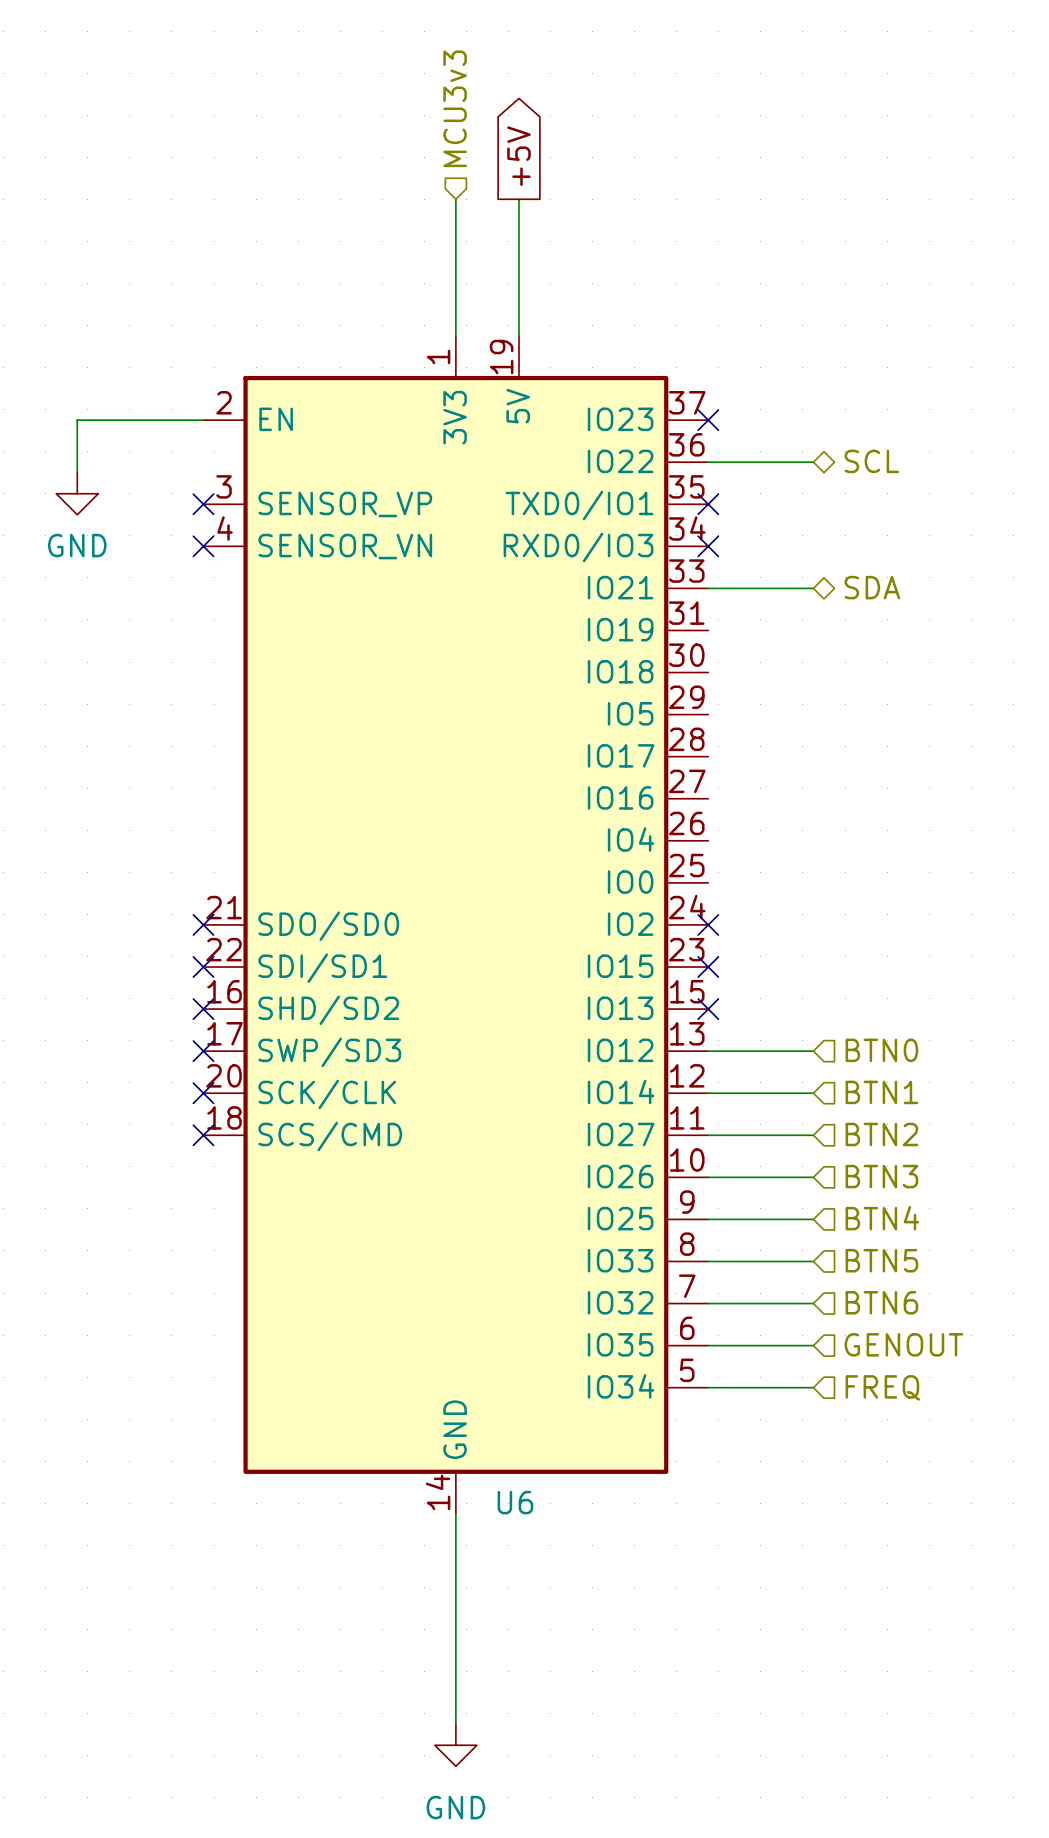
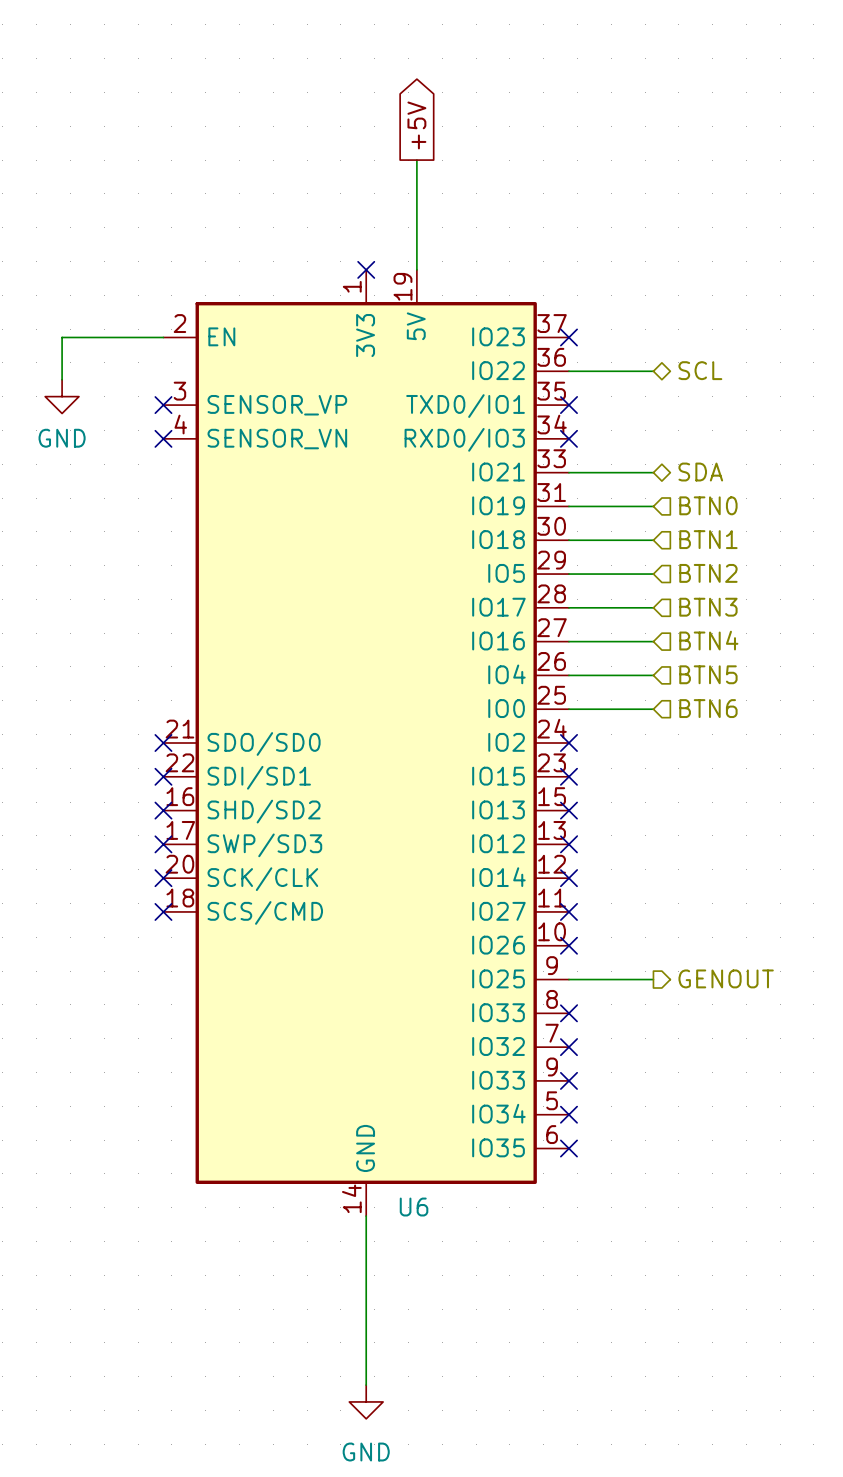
hierarchical label: MCU3v3 (455, 108) -> none
wire: (455, 199) (455, 335) -> none
U6 symbol: [203, 335, 709, 1514] -> [163, 269, 569, 1217]
no-connect mark: none -> (366, 269)
hierarchical label: none -> BTN0 (708, 505)
wire: none -> (568, 506) (653, 506)
hierarchical label: none -> BTN1 (708, 539)
hierarchical label: none -> BTN2 (708, 573)
hierarchical label: none -> BTN3 (708, 607)
hierarchical label: none -> BTN4 (708, 640)
wire: none -> (568, 675) (653, 675)
hierarchical label: none -> BTN5 (708, 674)
hierarchical label: none -> BTN6 (708, 708)
hierarchical label: BTN0 (881, 1050) -> none
wire: (708, 1051) (813, 1051) -> (568, 540) (653, 540)
no-connect mark: none -> (568, 844)
hierarchical label: BTN1 (881, 1092) -> none
wire: (708, 1093) (813, 1093) -> (568, 574) (653, 574)
no-connect mark: none -> (568, 878)
hierarchical label: BTN2 (881, 1134) -> none
wire: (708, 1135) (813, 1135) -> (568, 607) (653, 607)
no-connect mark: none -> (568, 911)
hierarchical label: BTN3 (881, 1176) -> none
wire: (708, 1177) (813, 1177) -> (568, 641) (653, 641)
no-connect mark: none -> (568, 945)
hierarchical label shape: input (882, 1218) -> output (726, 978)
hierarchical label: BTN4 (882, 1218) -> GENOUT (726, 978)
hierarchical label: BTN5 (881, 1260) -> none
wire: (708, 1261) (813, 1261) -> (568, 709) (653, 709)
no-connect mark: none -> (568, 1013)
hierarchical label: BTN6 (881, 1302) -> none
wire: (708, 1303) (813, 1303) -> none
no-connect mark: none -> (568, 1047)
hierarchical label: GENOUT (903, 1344) -> none
wire: (708, 1345) (813, 1345) -> none
no-connect mark: none -> (568, 1080)
wire: (708, 1387) (813, 1387) -> none
no-connect mark: none -> (568, 1114)
hierarchical label: FREQ (882, 1387) -> none
no-connect mark: none -> (568, 1148)

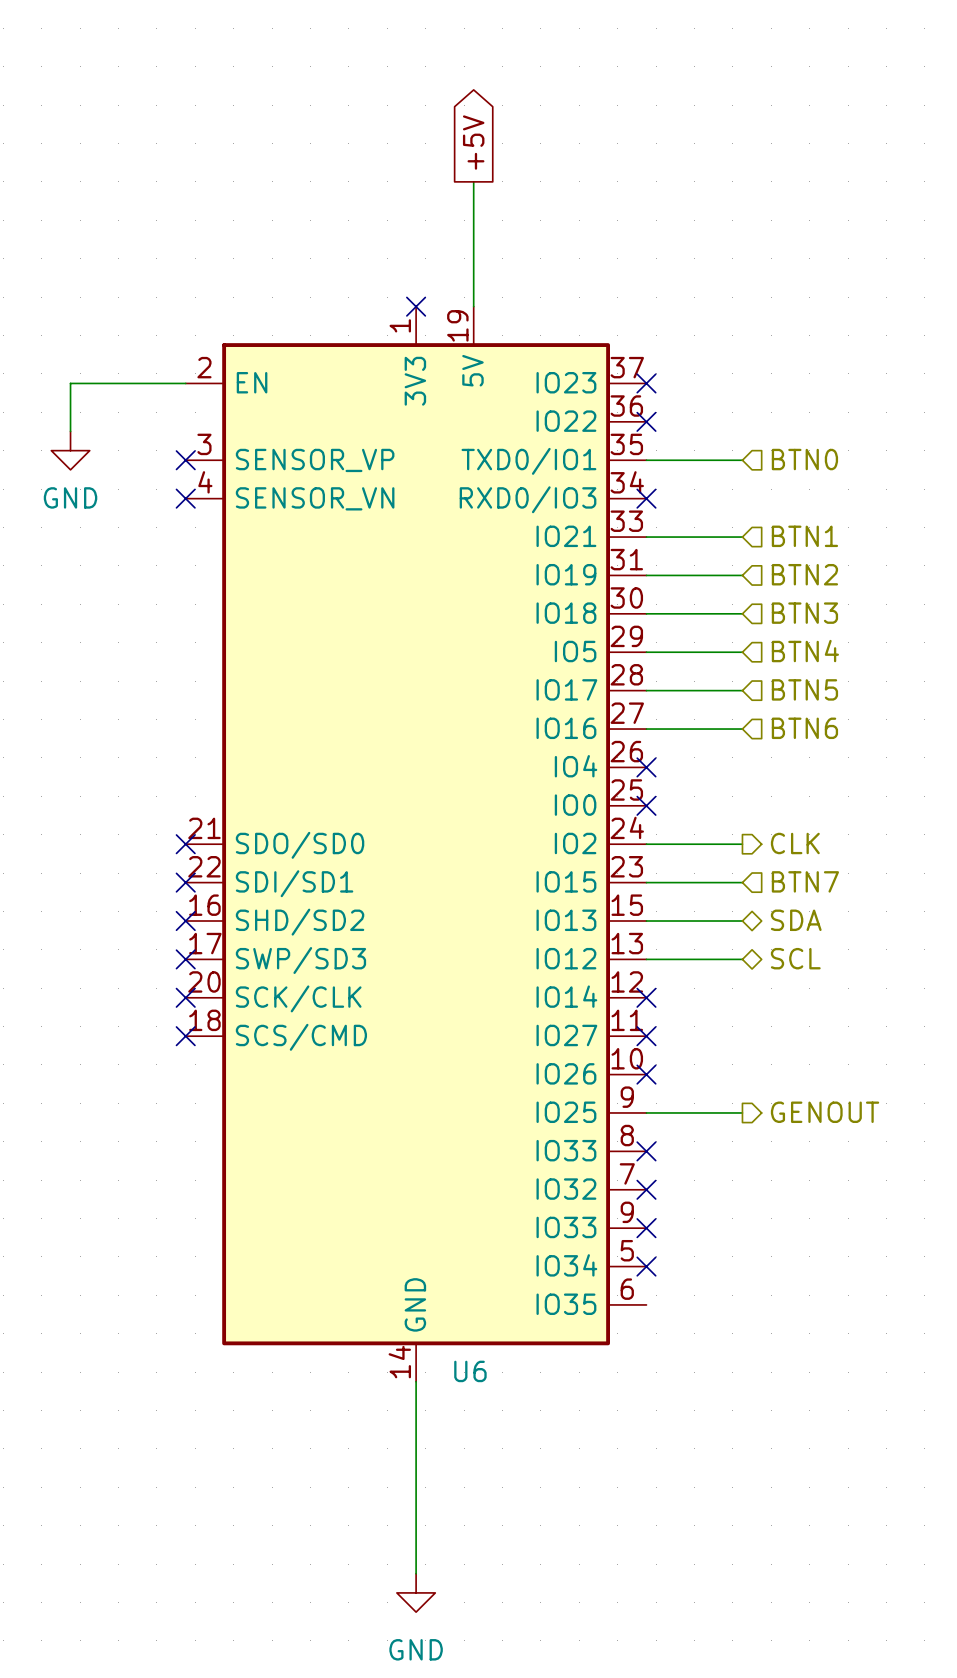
hierarchical label: SCL (700, 370) -> none
wire: (568, 371) (653, 371) -> (646, 460) (742, 460)
hierarchical label: none -> BTN0 (804, 459)
no-connect mark position: (568, 405) -> (646, 421)
hierarchical label shape: bidirectional (700, 472) -> input (804, 536)
hierarchical label: SDA (700, 472) -> BTN1 (804, 536)
hierarchical label: BTN0 (708, 505) -> BTN2 (804, 574)
hierarchical label: BTN1 (708, 539) -> BTN3 (804, 613)
hierarchical label: BTN2 (708, 573) -> BTN4 (805, 651)
hierarchical label: BTN3 (708, 607) -> BTN5 (804, 689)
hierarchical label: BTN4 (708, 640) -> BTN6 (804, 728)
hierarchical label: BTN5 (708, 674) -> none
wire: (568, 675) (653, 675) -> (646, 882) (742, 882)
no-connect mark: none -> (646, 767)
hierarchical label: BTN6 (708, 708) -> none
wire: (568, 709) (653, 709) -> (646, 844) (742, 844)
no-connect mark: none -> (646, 805)
hierarchical label: none -> CLK (795, 843)
no-connect mark: (568, 743) -> none
no-connect mark: (568, 776) -> none
hierarchical label: none -> BTN7 (805, 881)
hierarchical label: none -> SDA (796, 920)
wire: none -> (646, 921) (742, 921)
no-connect mark: (568, 810) -> none
hierarchical label: none -> SCL (795, 958)
wire: none -> (646, 959) (742, 959)
no-connect mark: (568, 844) -> none
no-connect mark: (568, 1148) -> none

